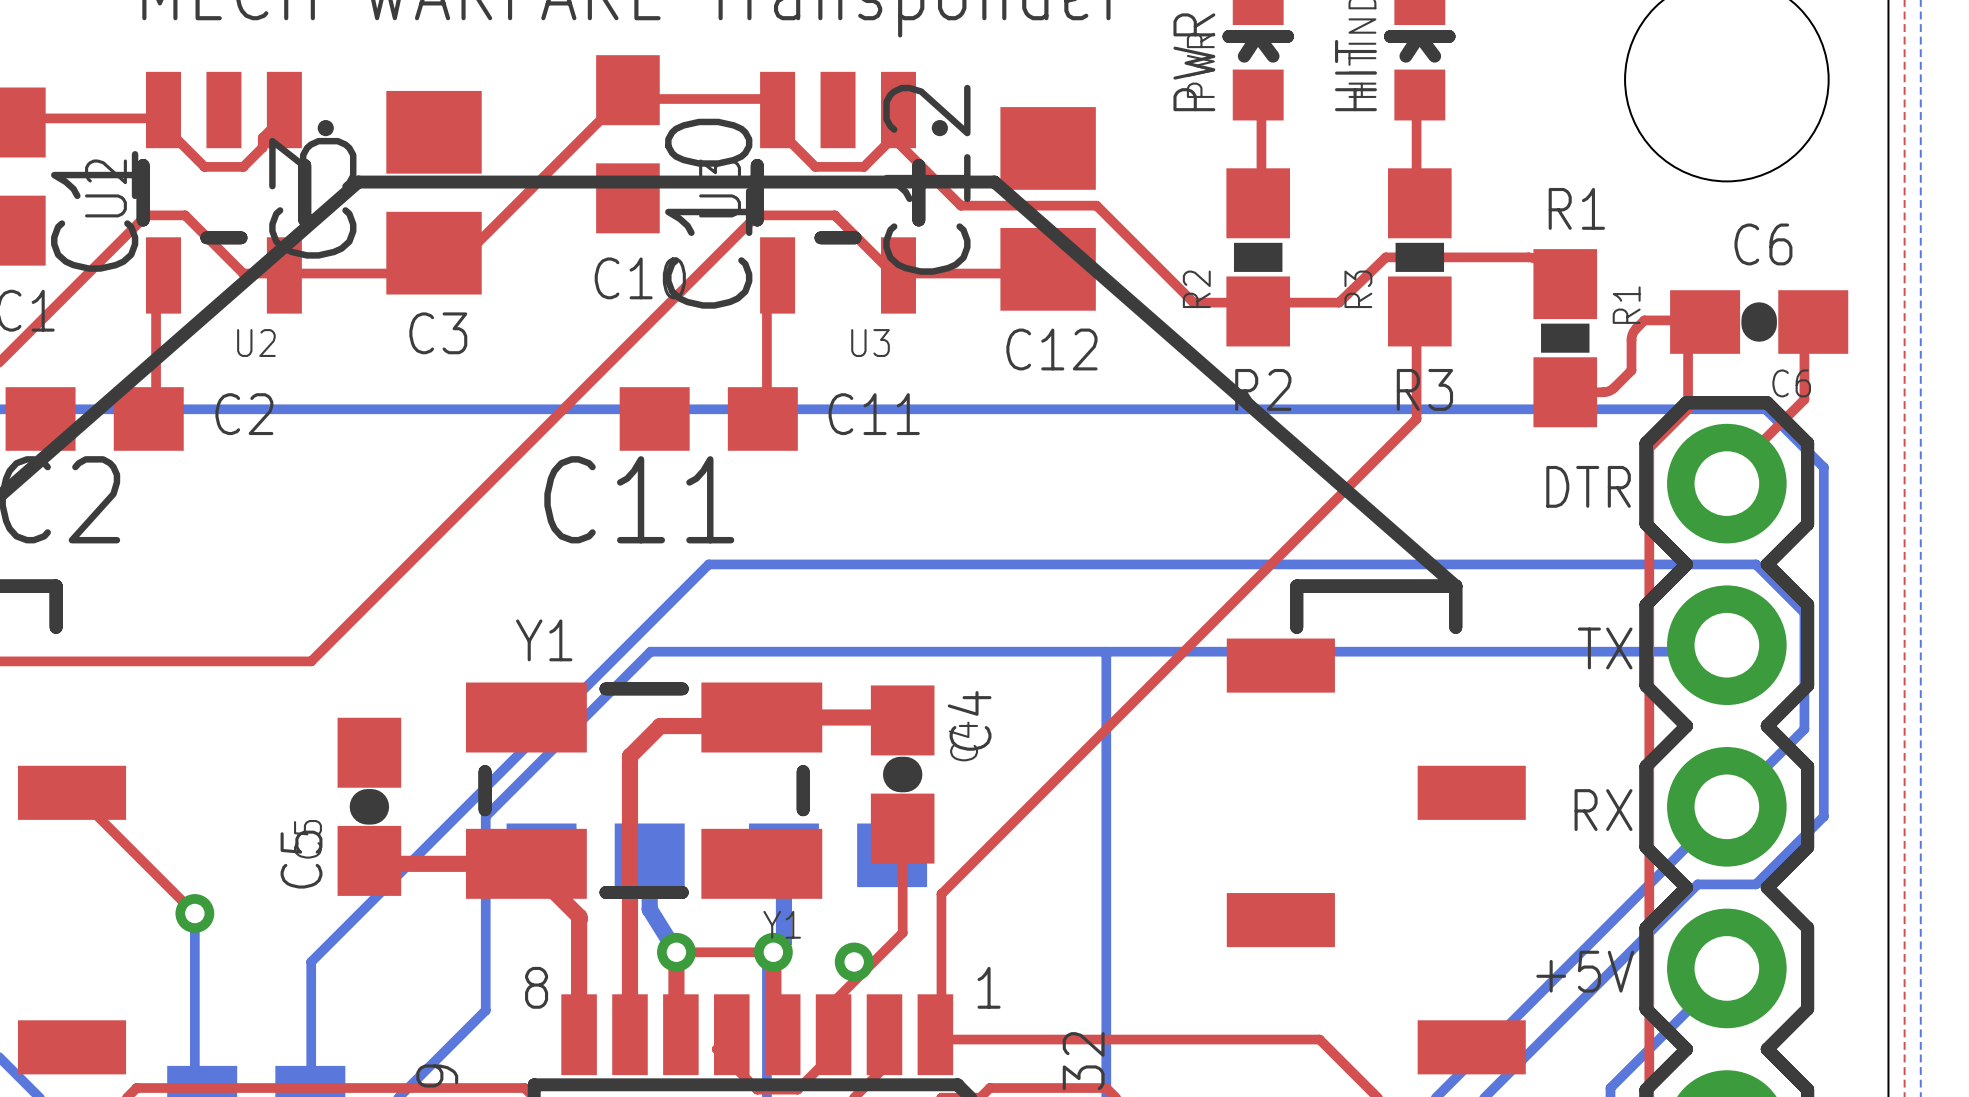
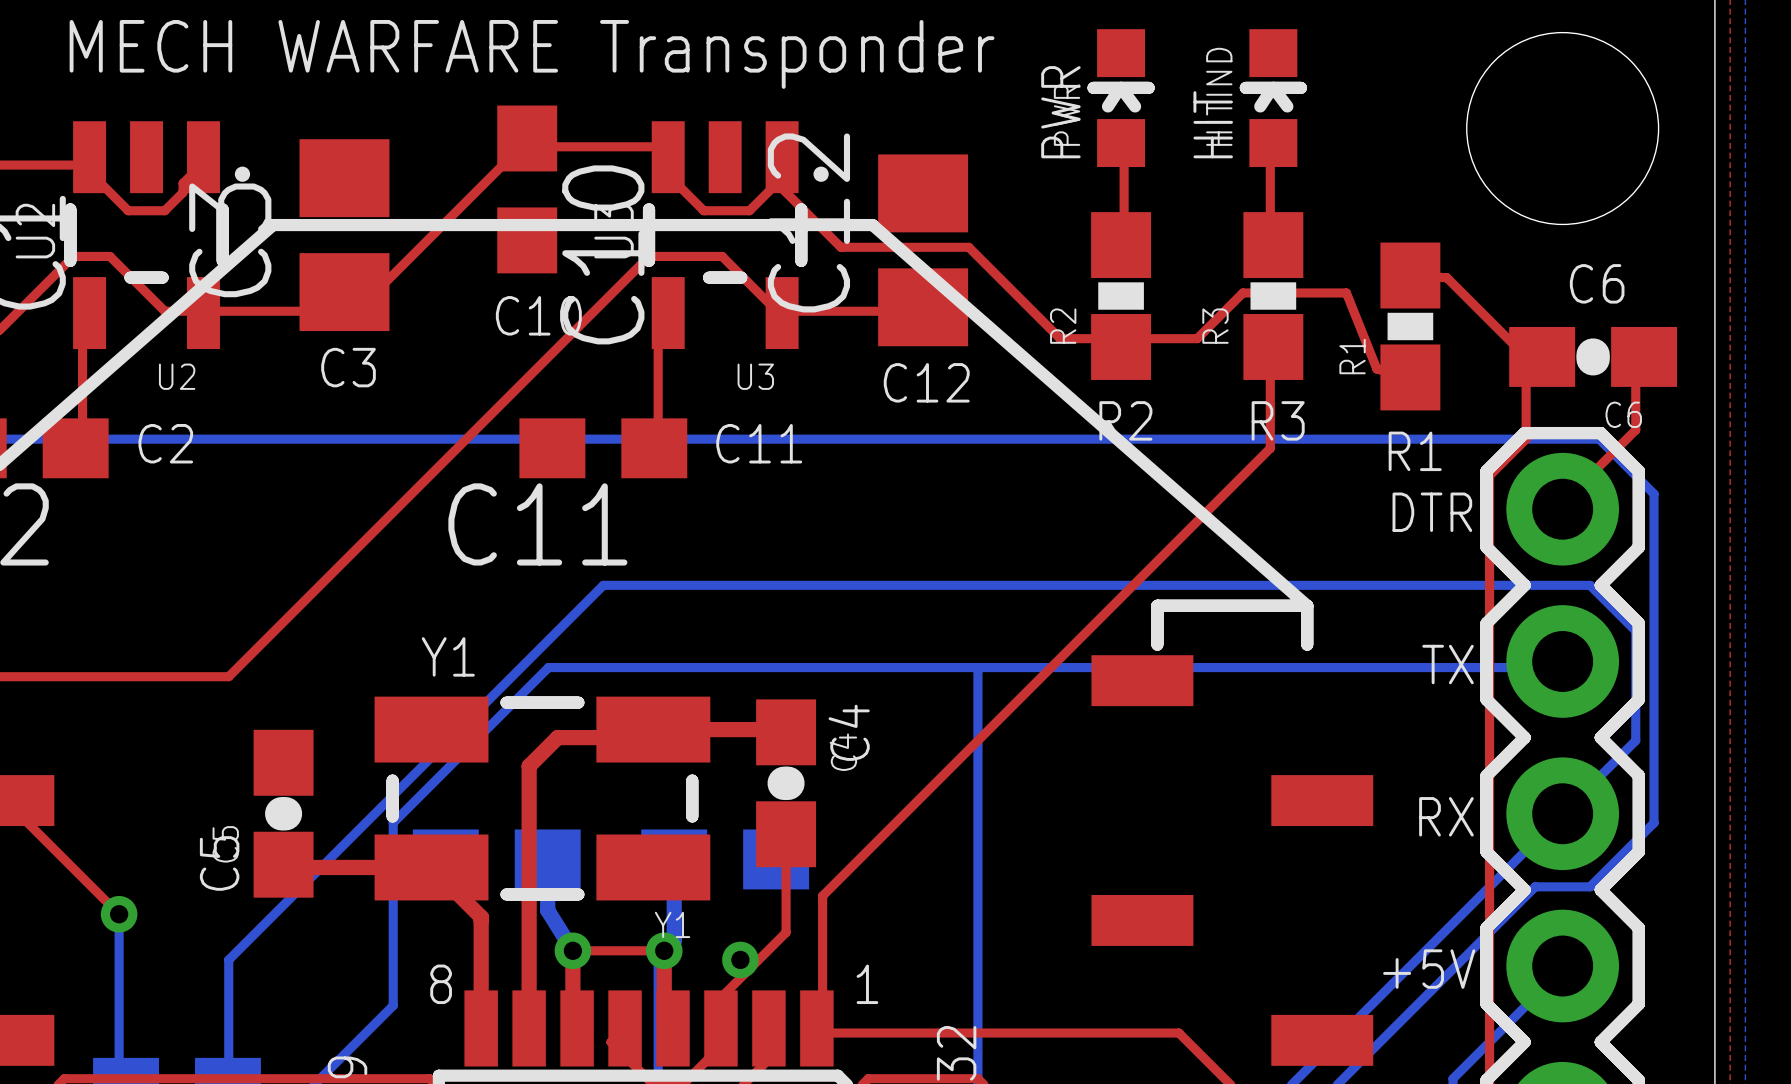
text position: R1 (1576, 208) -> R1 (1415, 451)
top track: none -> (1410, 275) (1446, 277) (1526, 356)
top track: (1565, 284) (1538, 260) (1530, 257) (1385, 257) (1339, 302) -> (1410, 377) (1376, 369) (1346, 292) (1242, 292) (1197, 338)
R1 name position: R1 (1626, 305) -> R1 (1352, 356)
top track: (1705, 322) (1701, 320) (1644, 320) (1632, 335) (1631, 370) (1614, 387) (1605, 392) (1565, 392) -> none
R1 position: (1565, 338) -> (1410, 326)

